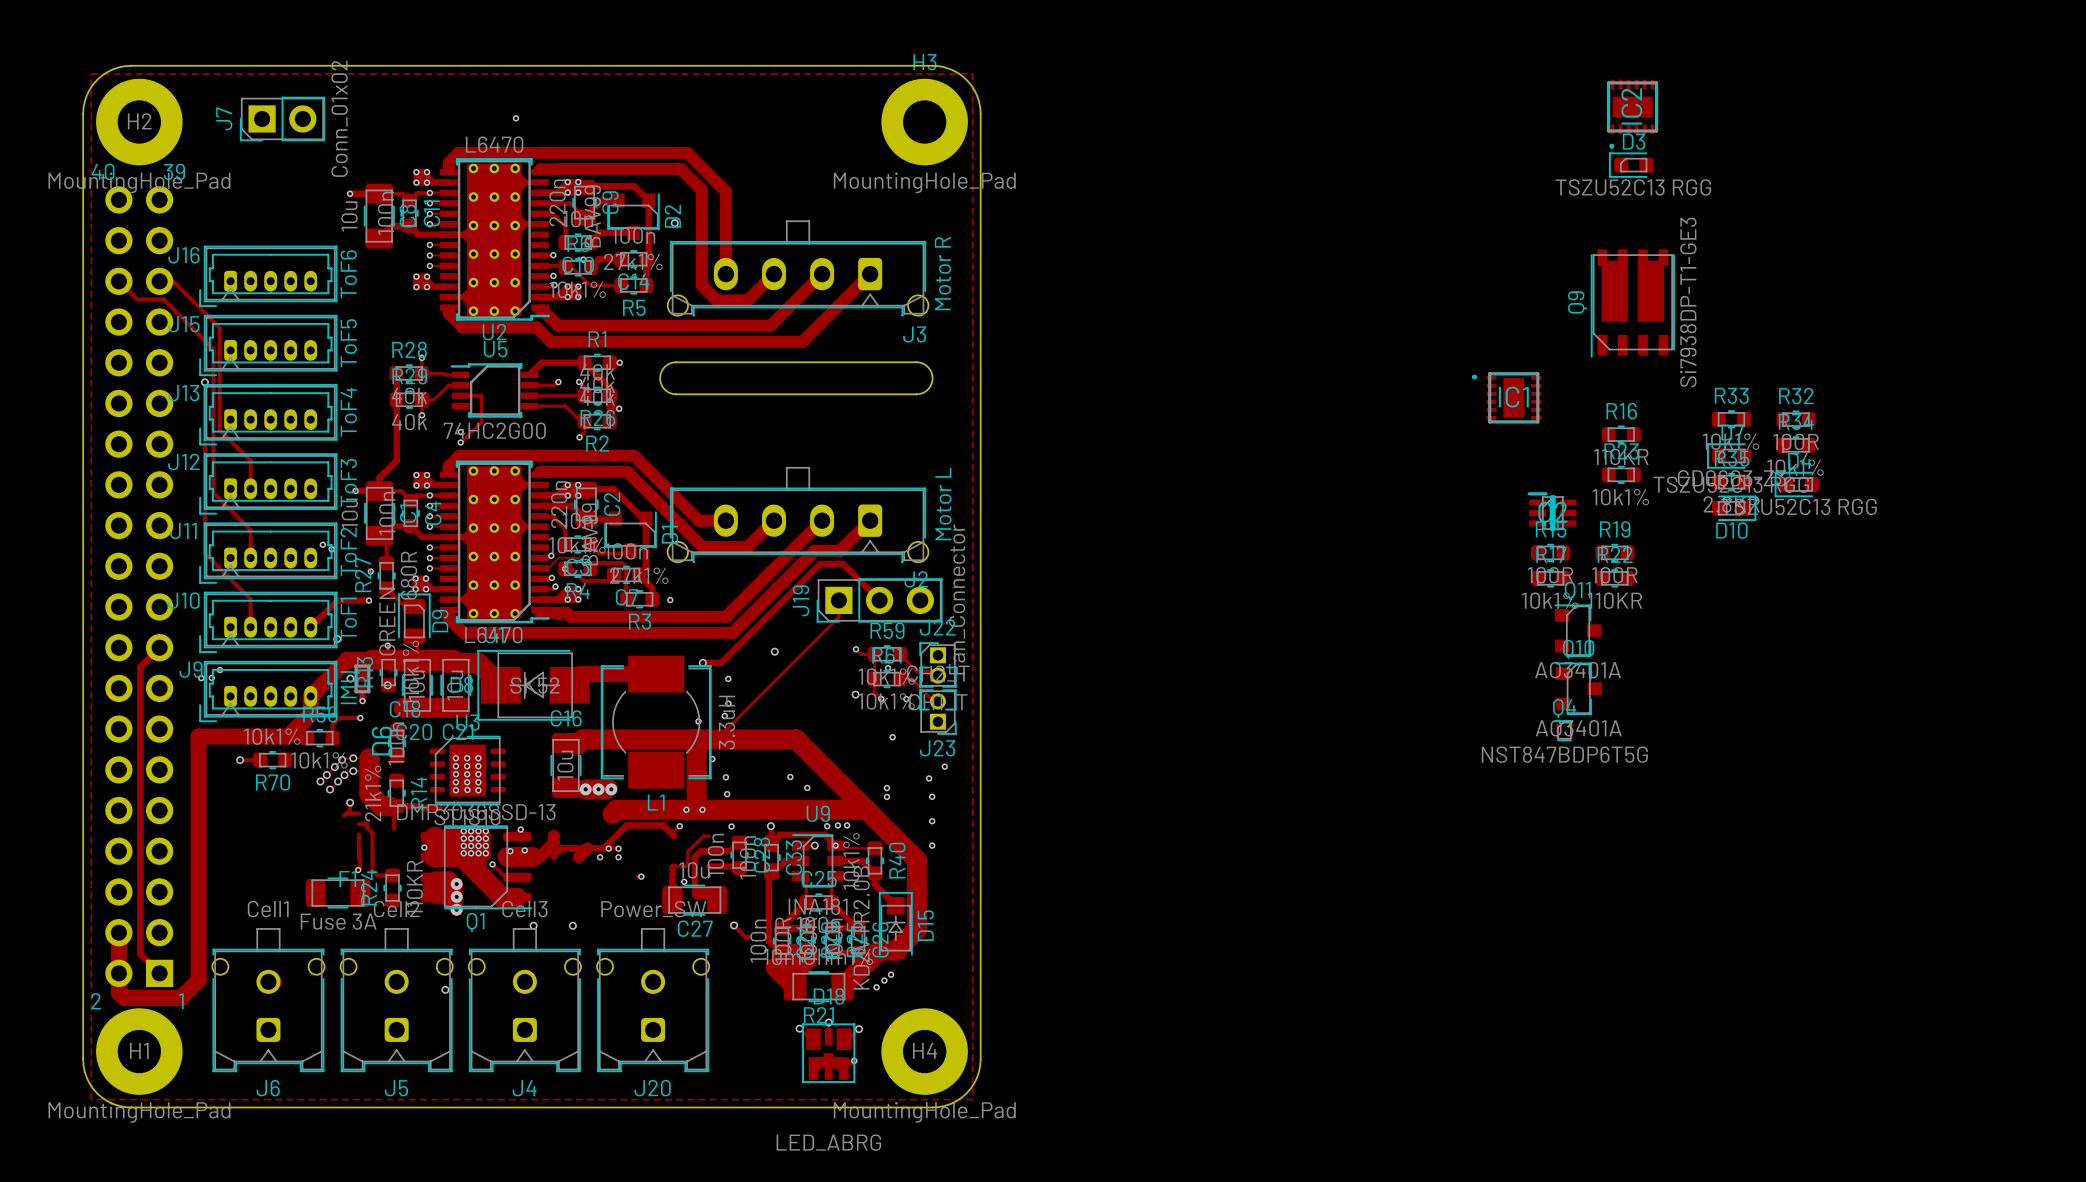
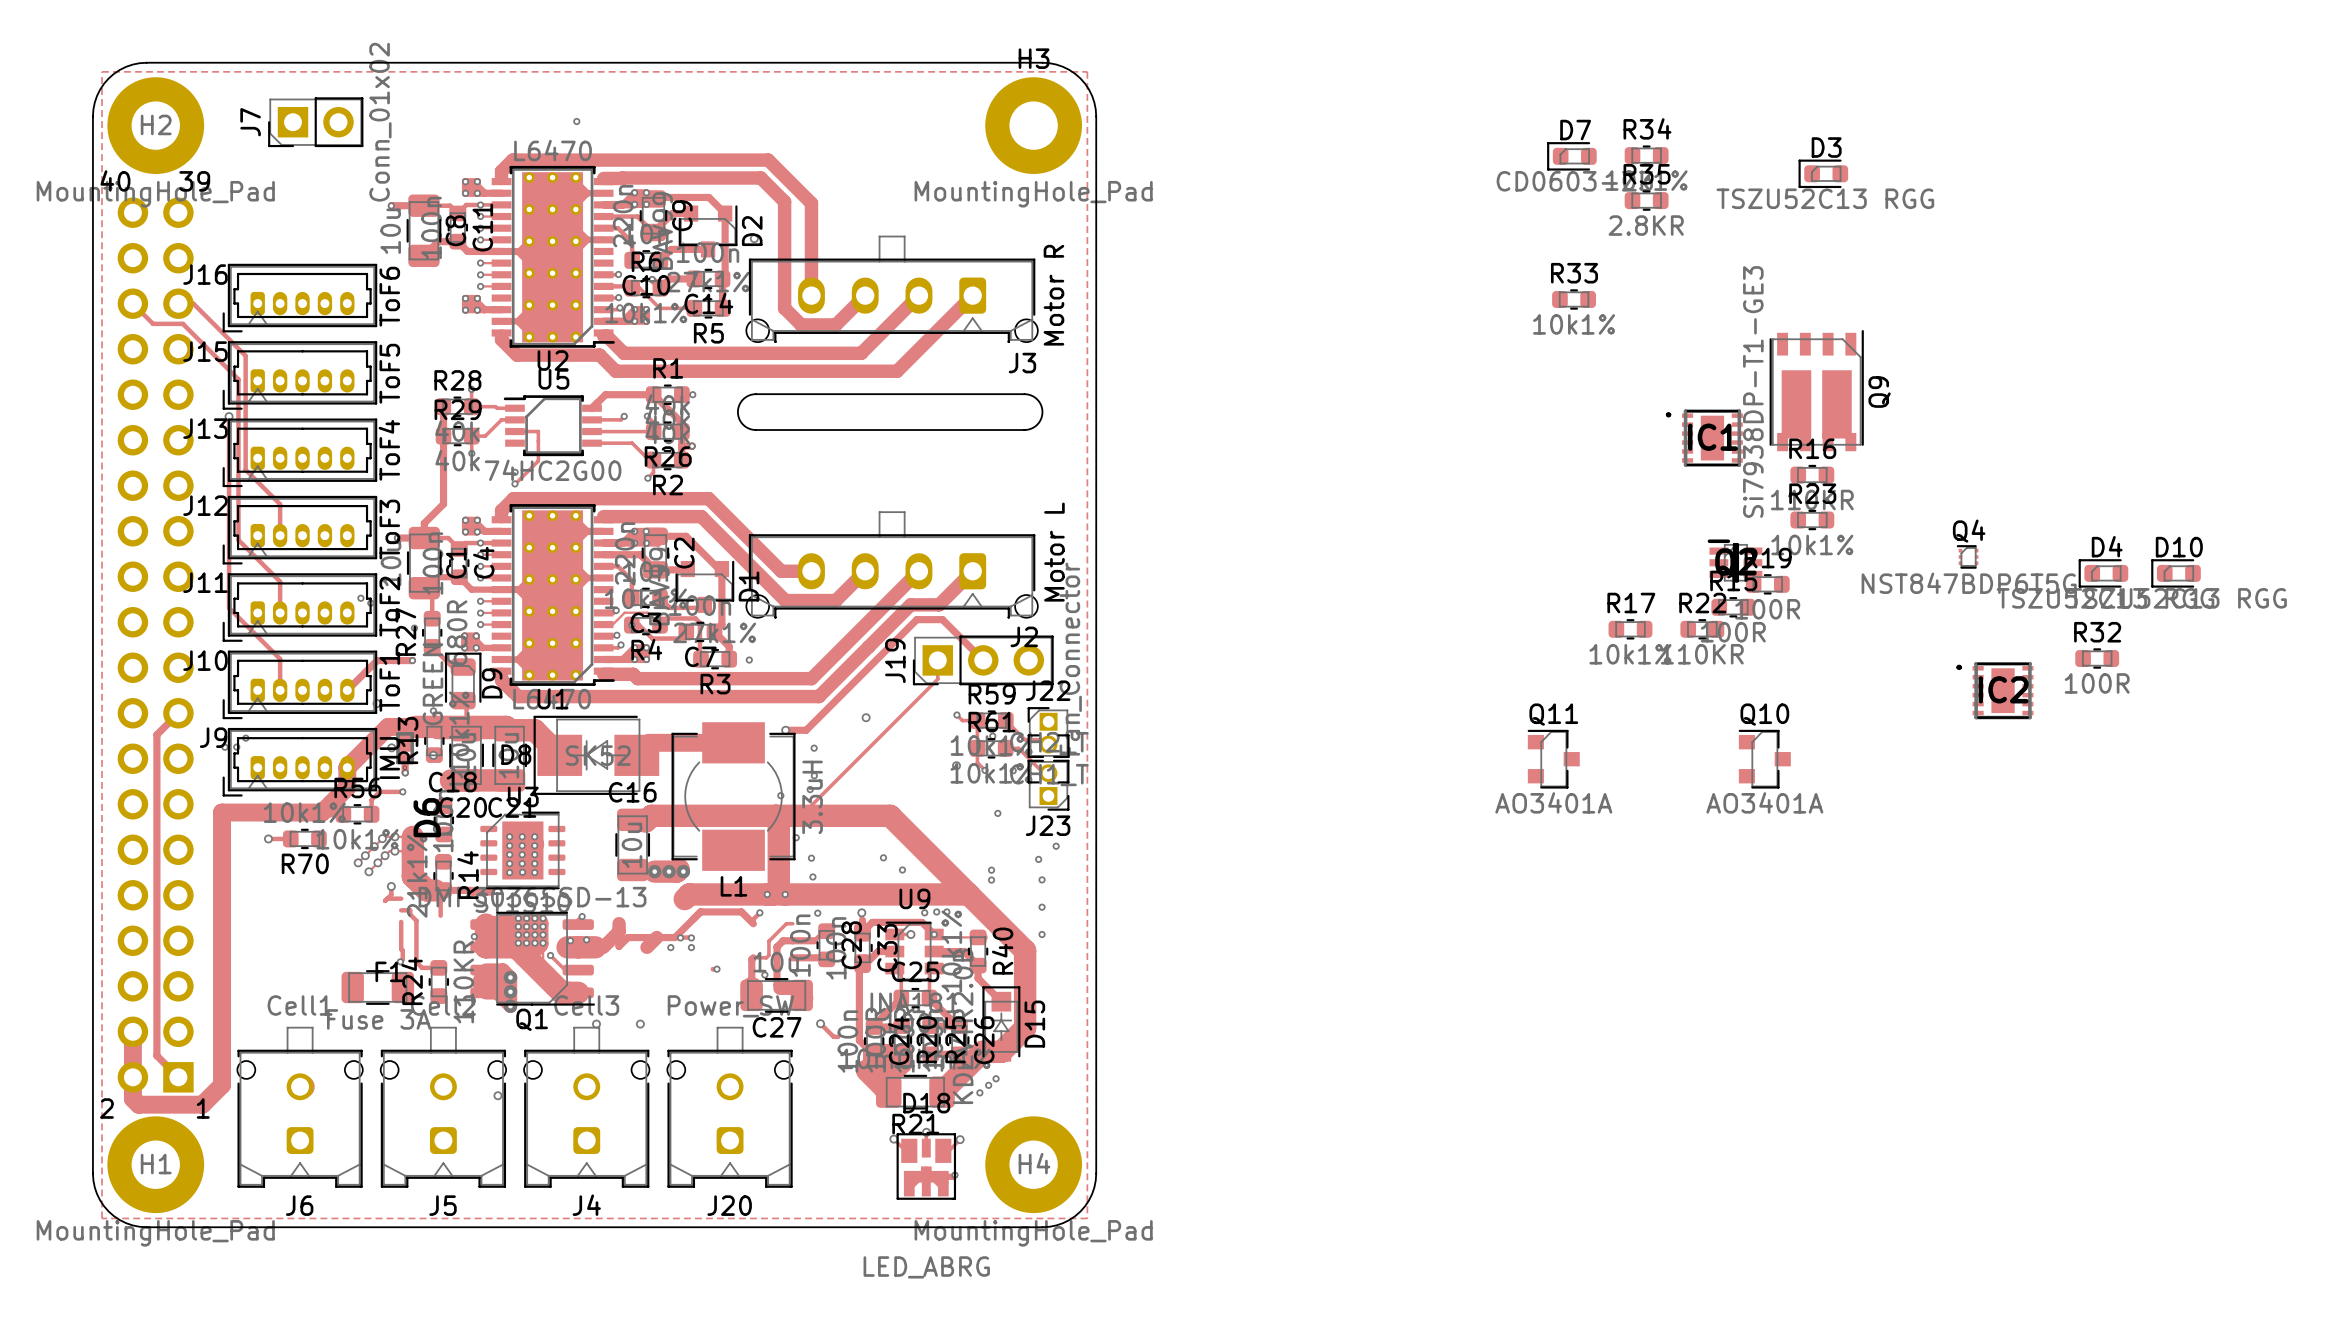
IC2 rotation: 0° (1632, 114) -> 90° clockwise (1994, 690)
IC2 position: (1632, 114) -> (1994, 690)
Q9 rotation: 0° (1632, 303) -> 180° (1816, 390)
IC1 position: (1506, 397) -> (1704, 438)
R33 position: (1731, 419) -> (1574, 299)
R32 position: (1796, 419) -> (2097, 658)
R34 position: (1795, 445) -> (1646, 155)
D7 position: (1729, 456) -> (1571, 156)
R35 position: (1731, 482) -> (1646, 200)
D4 position: (1796, 484) -> (2103, 573)
D10 rotation: 0° (1734, 508) -> 180° (2176, 573)
D10 position: (1734, 508) -> (2176, 573)
R19 position: (1614, 552) -> (1767, 584)
R17 position: (1550, 578) -> (1630, 629)
R22 position: (1614, 578) -> (1702, 629)
Q11 position: (1577, 630) -> (1553, 759)
Q4 position: (1563, 730) -> (1967, 556)

